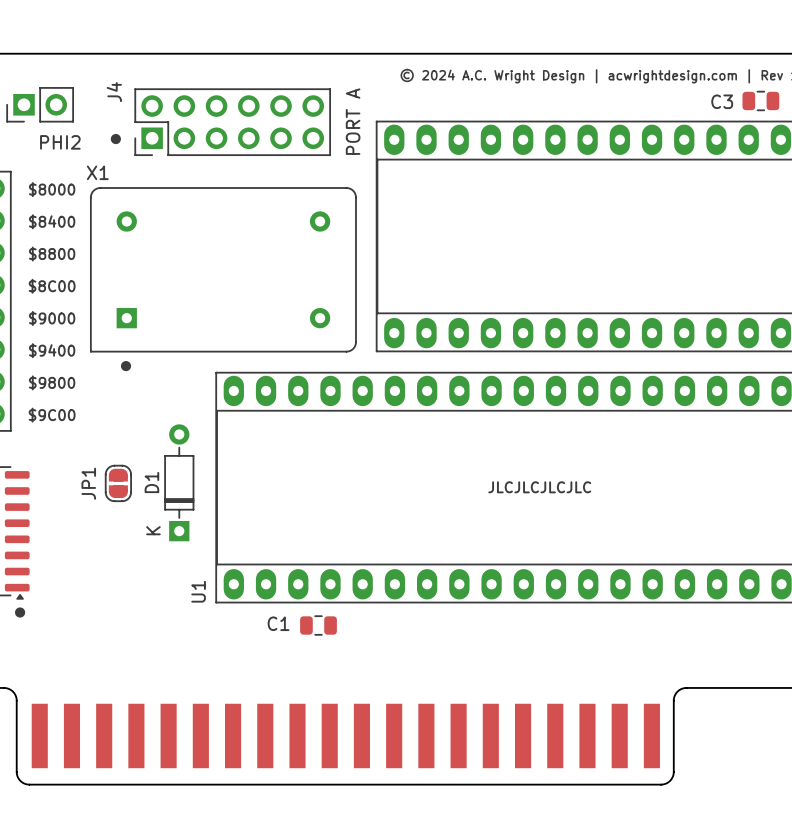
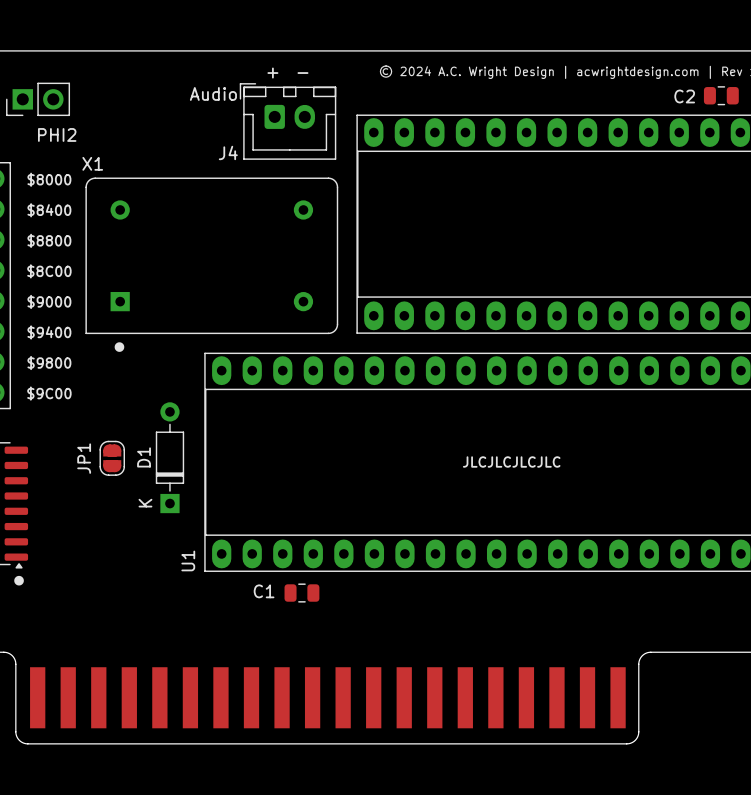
text: none -> + (272, 73)
text: none -> - (302, 73)
J4 footprint: [134, 88, 331, 156] -> [239, 83, 337, 160]
J4 name position: J4 (114, 92) -> J4 (228, 152)
C3 name: C3 (722, 101) -> C2 (684, 96)
J4 value: PORT A (353, 121) -> Audio (213, 93)
drawing: [110, 133, 121, 145] -> none

